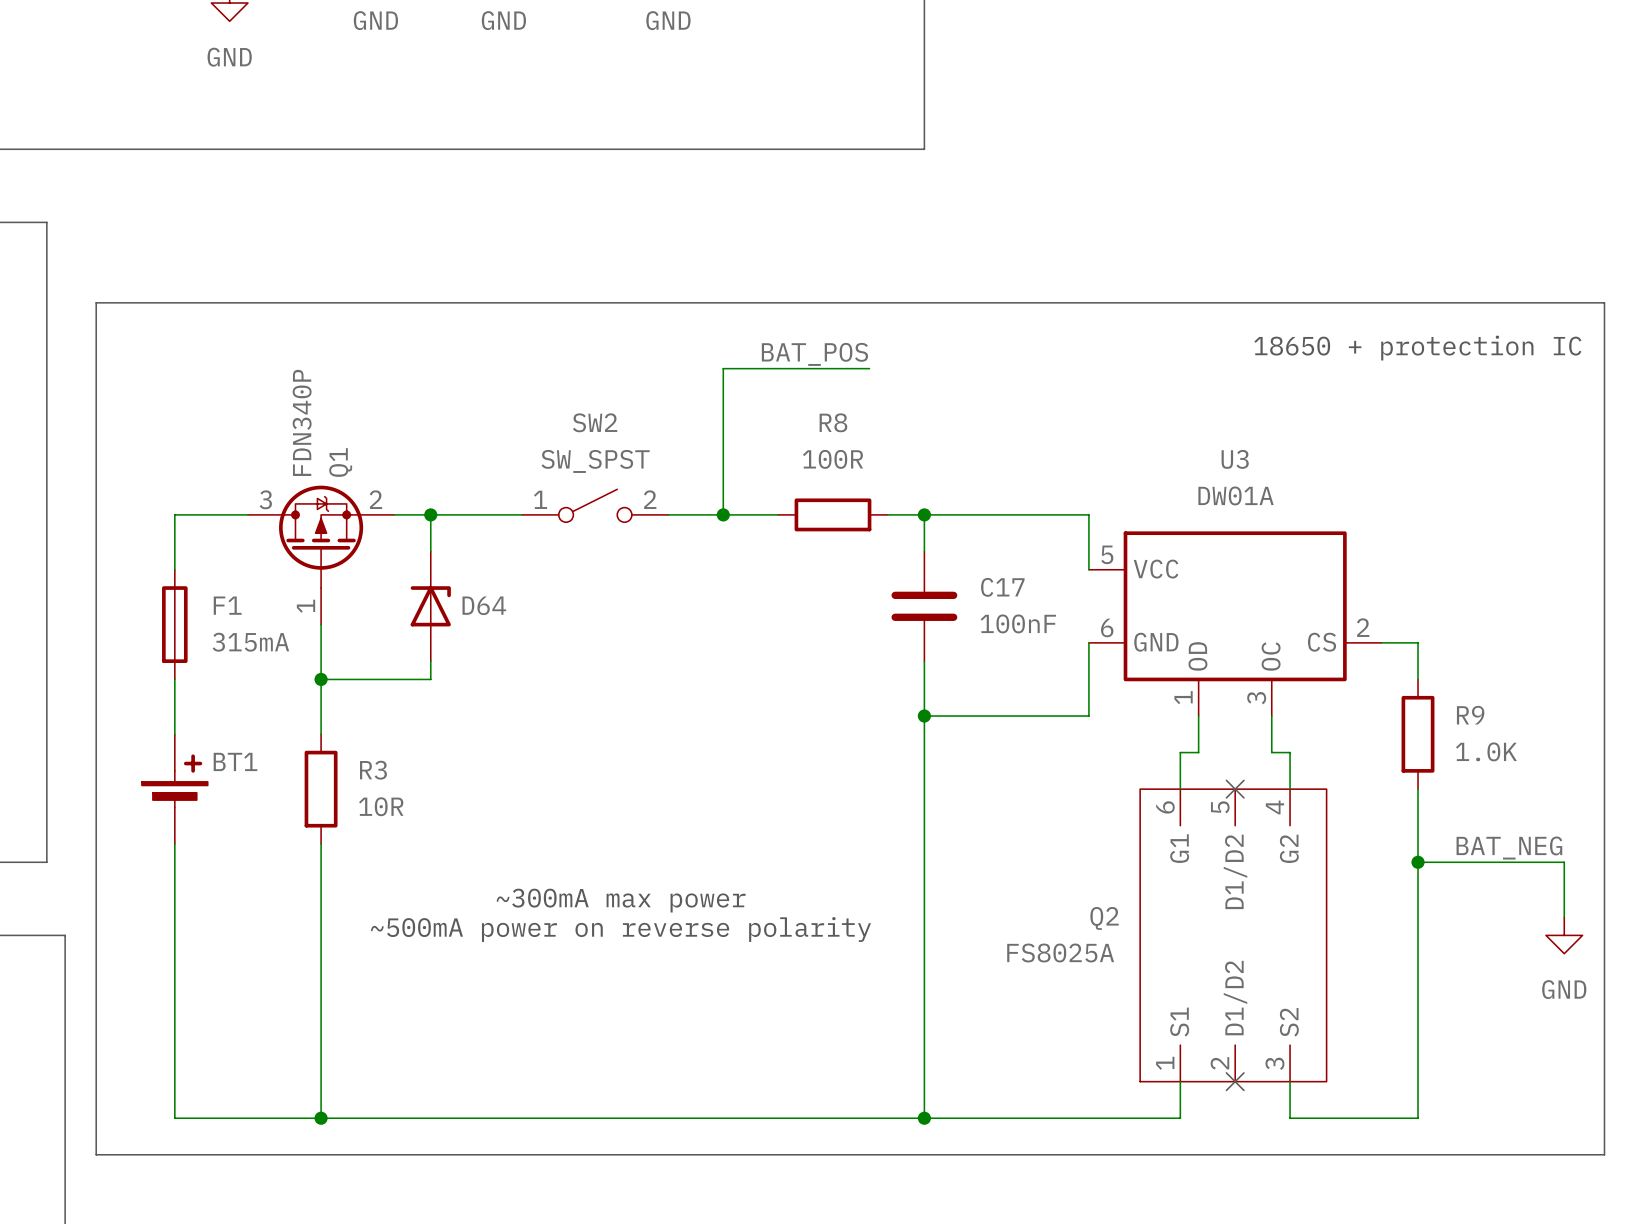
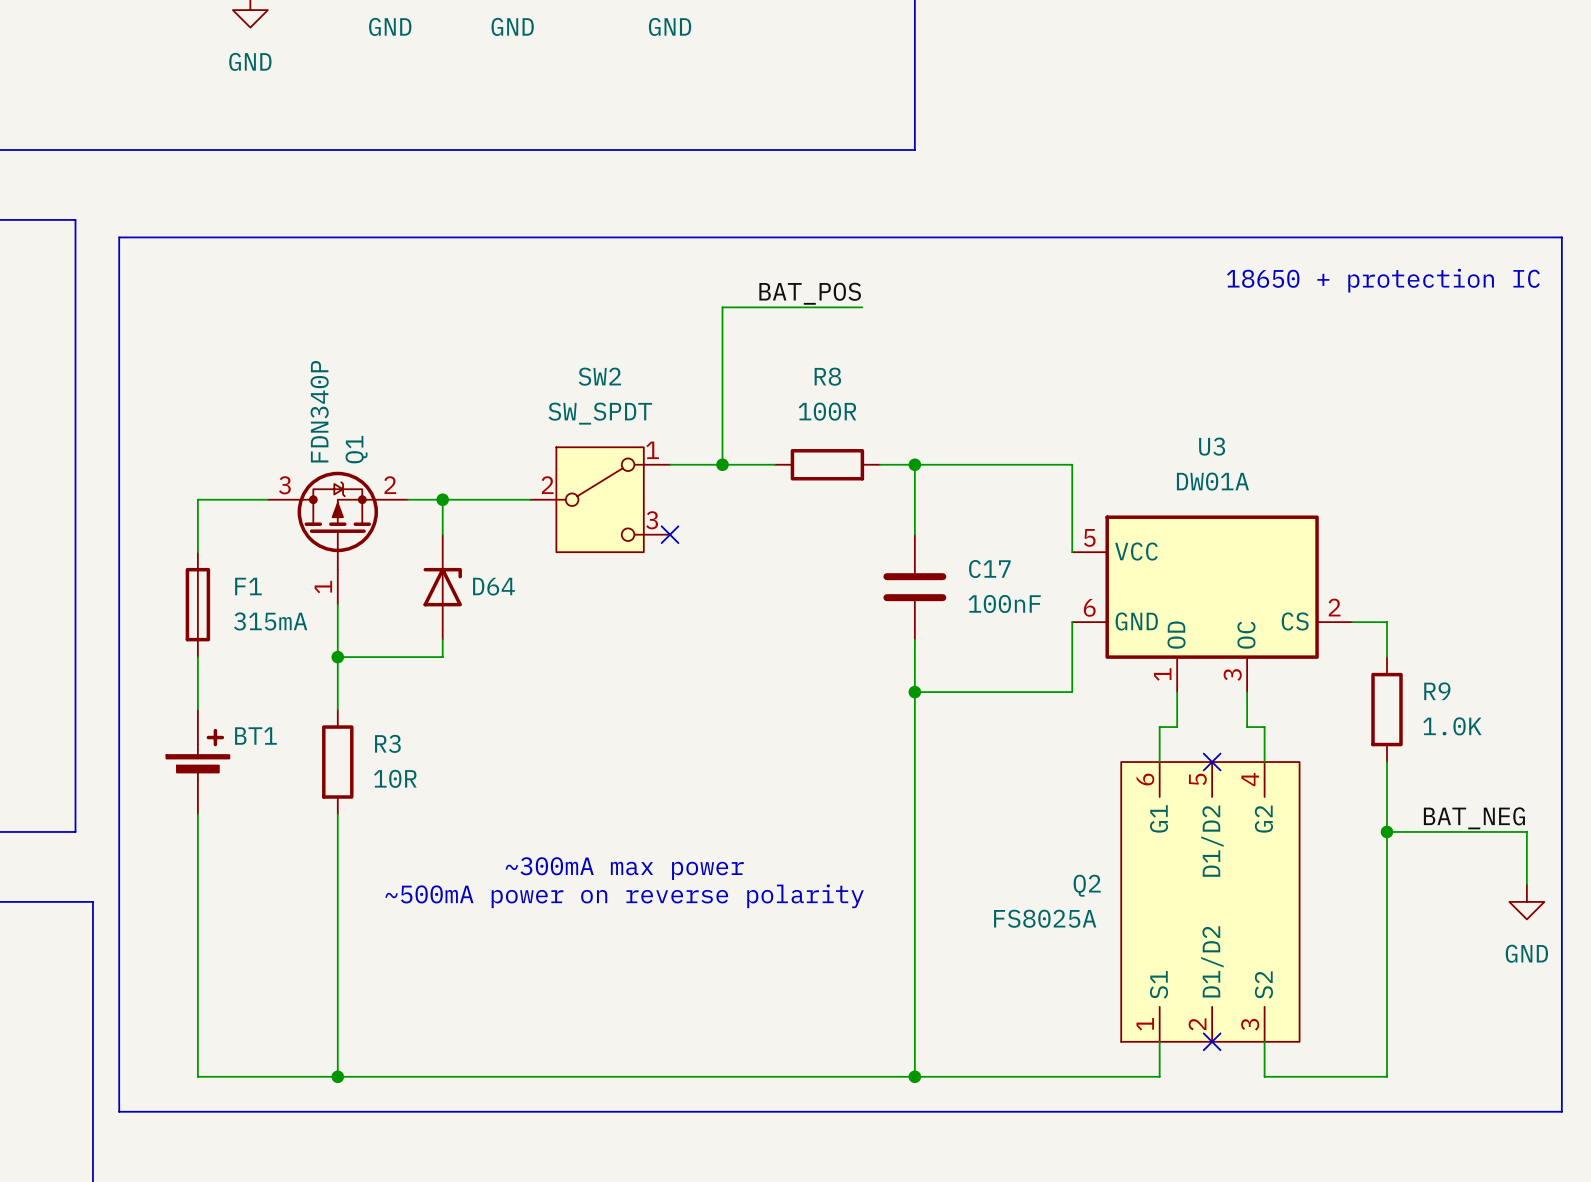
text position: 18650 + protection IC (1417, 348) -> 18650 + protection IC (1383, 280)
label position: BAT_POS (814, 354) -> BAT_POS (810, 293)
wire: (723, 368) (869, 368) -> (722, 359) (722, 307) (862, 307)
SW2 name position: SW2 (595, 422) -> SW2 (599, 376)
SW2 value: SW_SPST (595, 461) -> SW_SPDT (600, 413)
wire: (723, 478) (723, 514) -> (914, 464) (914, 499)
SW2 symbol: [522, 489, 669, 523] -> [530, 447, 671, 553]
wire: (668, 514) (778, 514) -> (670, 464) (774, 464)
junction position: (723, 514) -> (722, 464)
R8 position: (832, 514) -> (827, 464)
wire: (887, 514) (1088, 514) -> (879, 464) (1072, 464) (1072, 499)
junction position: (924, 514) -> (914, 464)
no-connect mark: none -> (670, 534)
line: (96, 1154) (96, 302) (1604, 302) (1604, 1154) (1600, 1154) -> (122, 1111) (119, 1111) (119, 237) (1561, 237) (1561, 1111)

